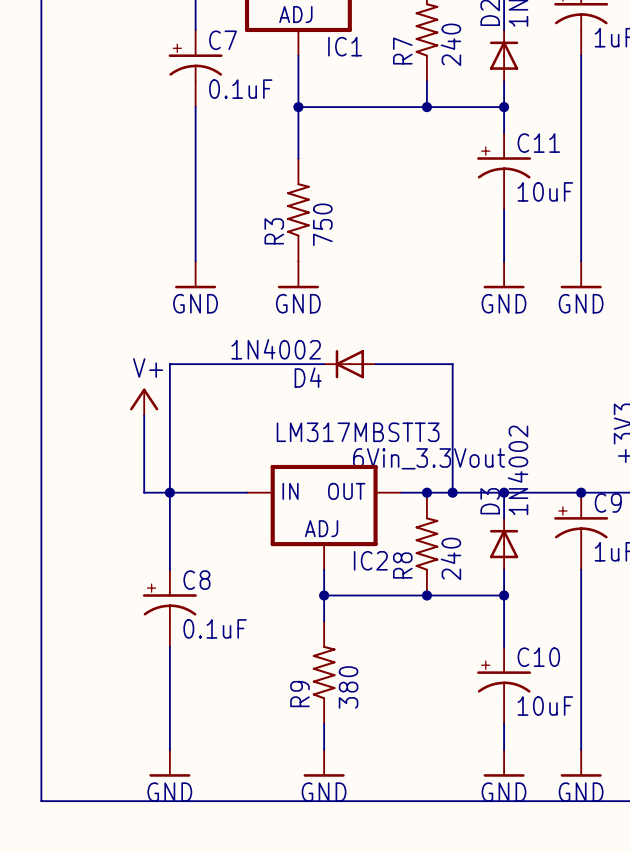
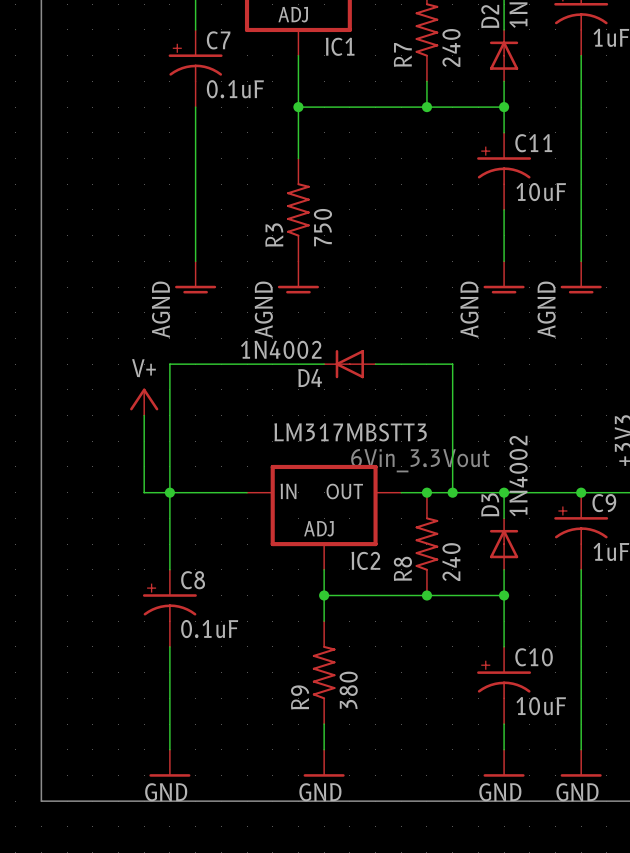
power symbol: GND (195, 274) -> AGND (195, 277)
power symbol: GND (298, 274) -> AGND (298, 277)
power symbol: GND (504, 274) -> AGND (504, 277)
power symbol: GND (581, 274) -> AGND (581, 277)

